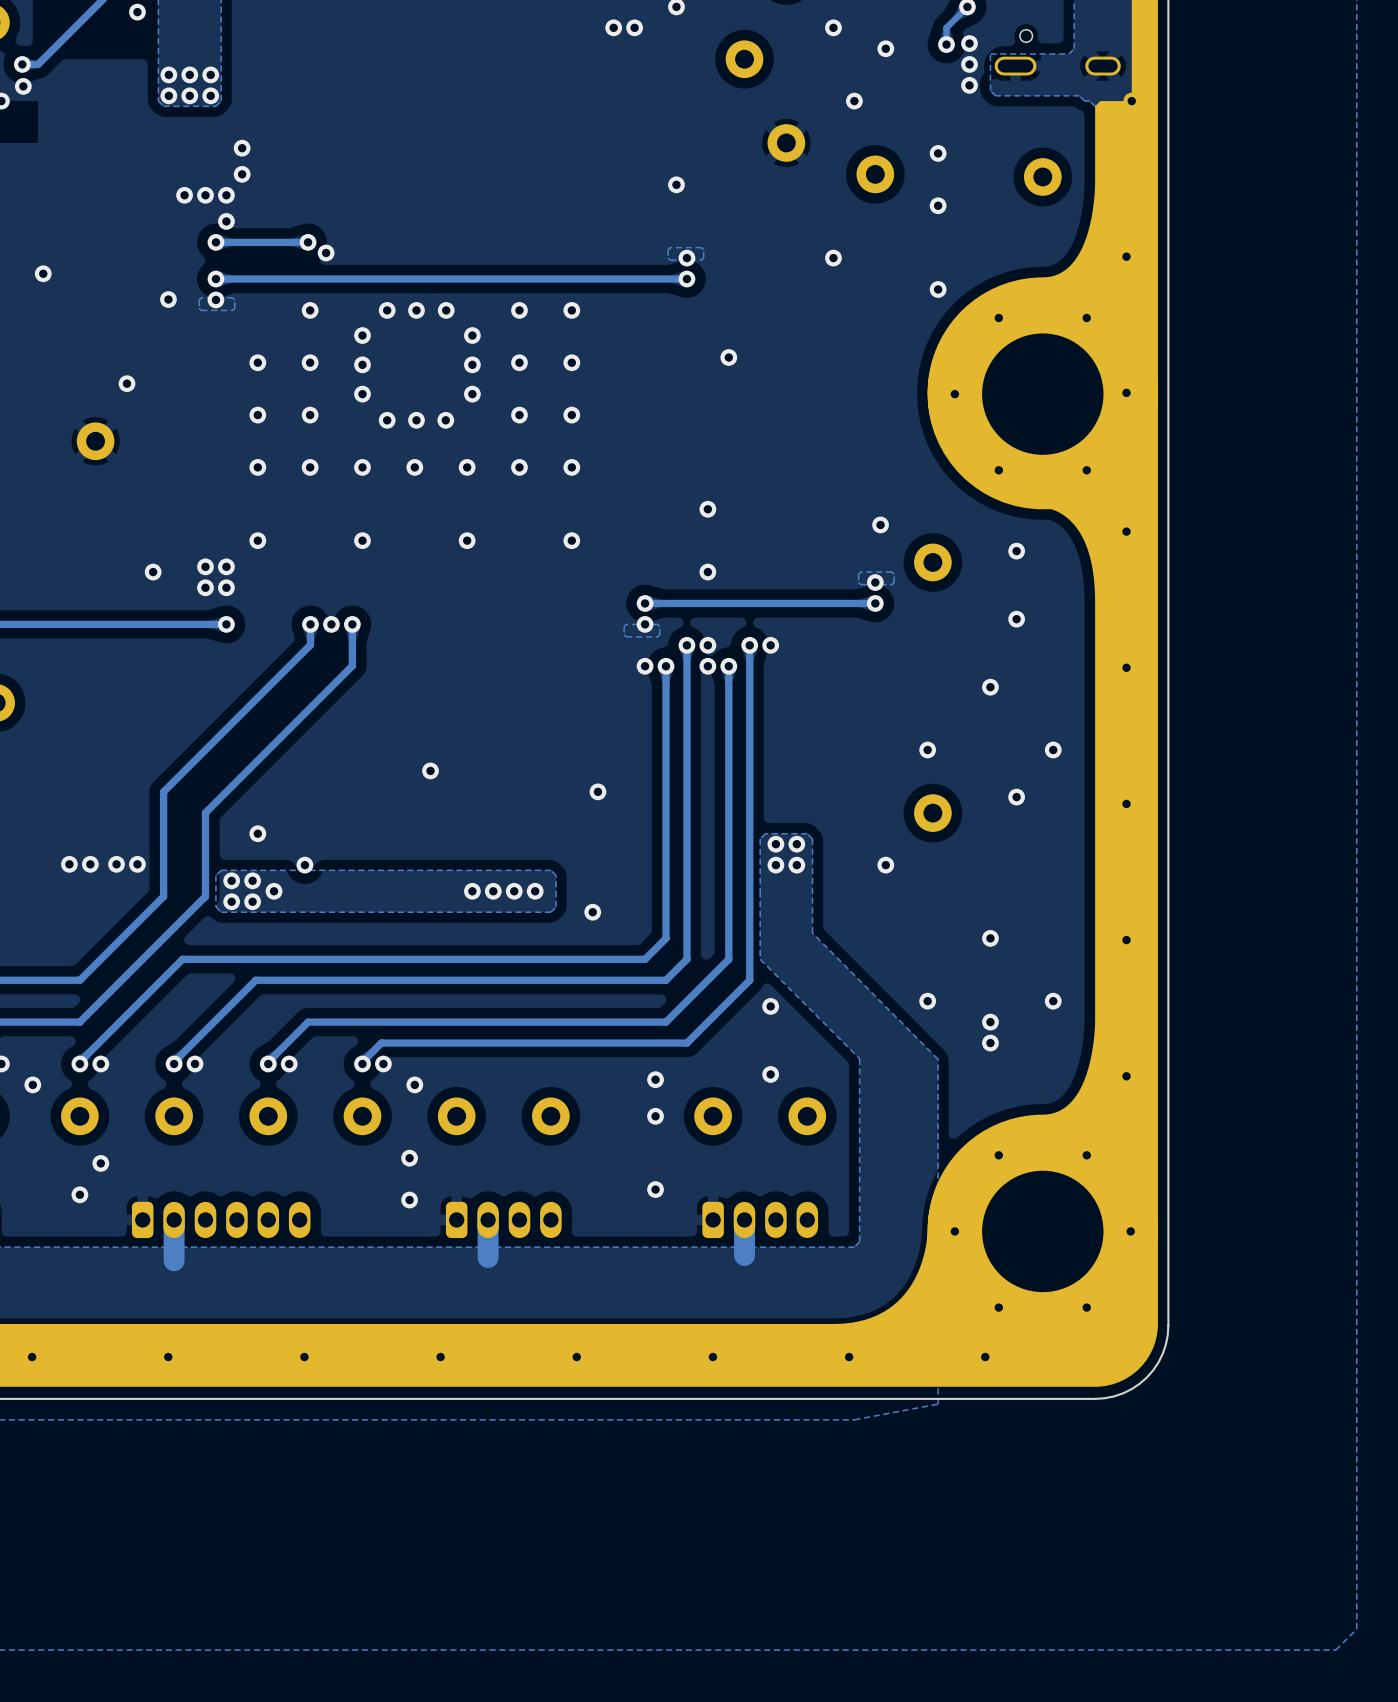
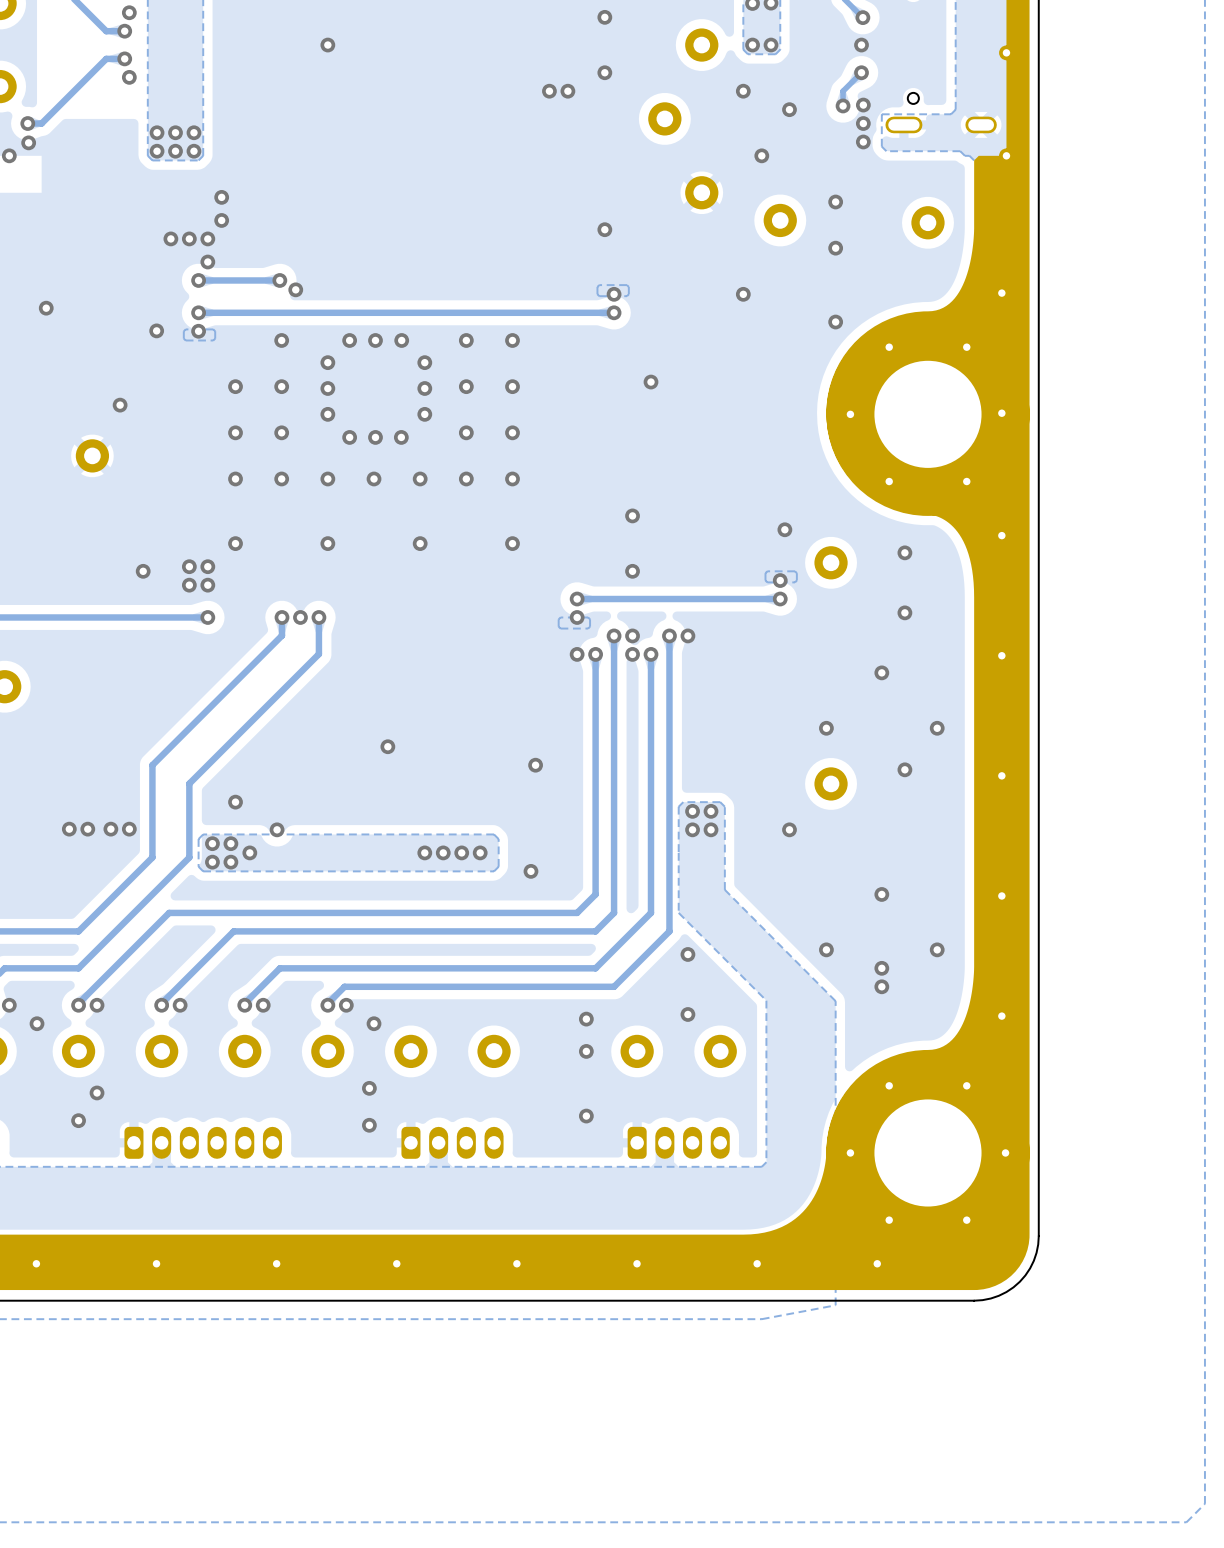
track: (174, 1219) (174, 1260) -> none
track: (488, 1219) (488, 1257) -> none
track: (744, 1219) (744, 1255) -> none

